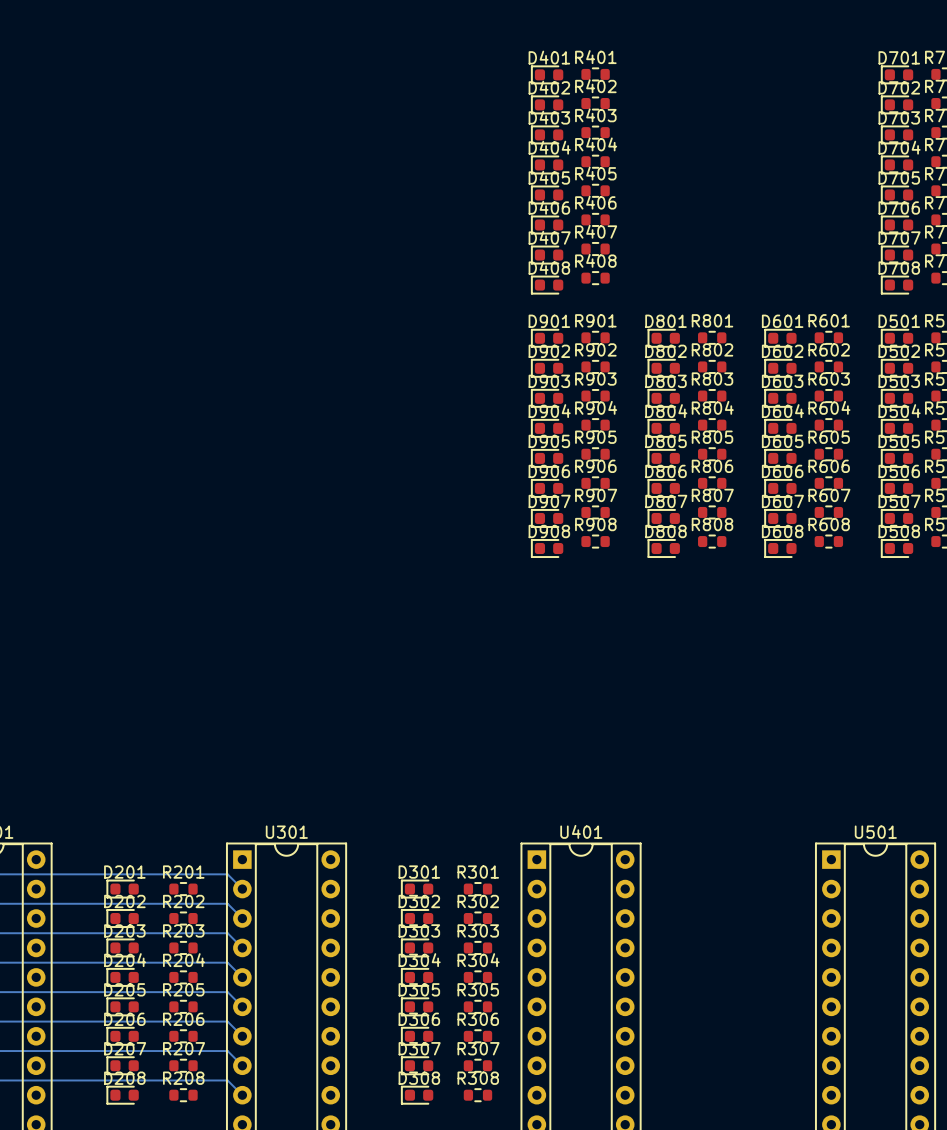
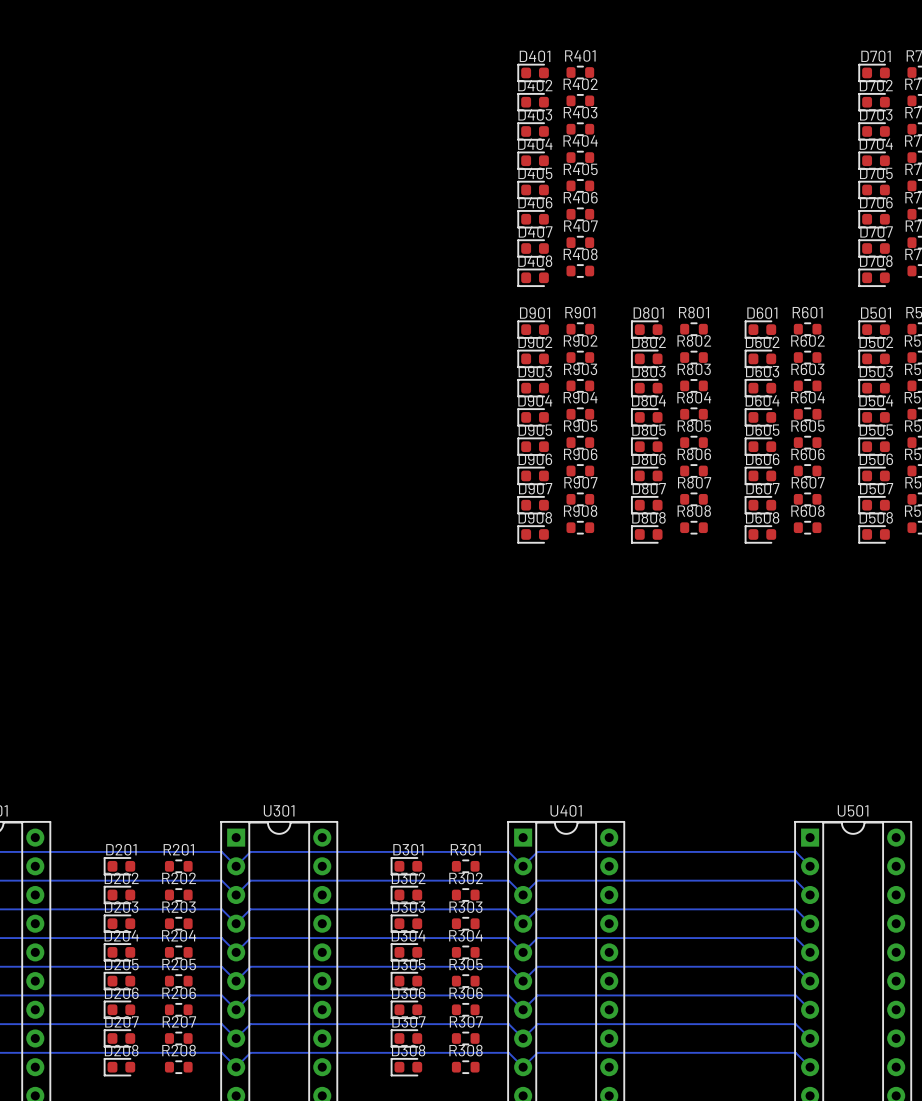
bottom track: none -> (236, 866) (250, 851) (508, 851) (523, 866) (537, 851) (795, 851) (810, 866)
bottom track: none -> (236, 895) (250, 880) (508, 880) (523, 895) (537, 880) (795, 880) (810, 895)
bottom track: none -> (236, 923) (250, 909) (508, 909) (523, 923) (537, 909) (795, 909) (810, 923)
bottom track: none -> (236, 952) (250, 938) (508, 938) (523, 952) (537, 938) (795, 938) (810, 952)
bottom track: none -> (236, 981) (250, 966) (508, 966) (523, 981) (537, 966) (795, 966) (810, 981)
bottom track: none -> (236, 1009) (250, 995) (508, 995) (523, 1009) (537, 995) (795, 995) (810, 1009)
bottom track: none -> (236, 1038) (250, 1024) (508, 1024) (523, 1038) (537, 1024) (795, 1024) (810, 1038)
bottom track: none -> (236, 1067) (250, 1052) (508, 1052) (523, 1067) (537, 1052) (795, 1052) (810, 1067)

